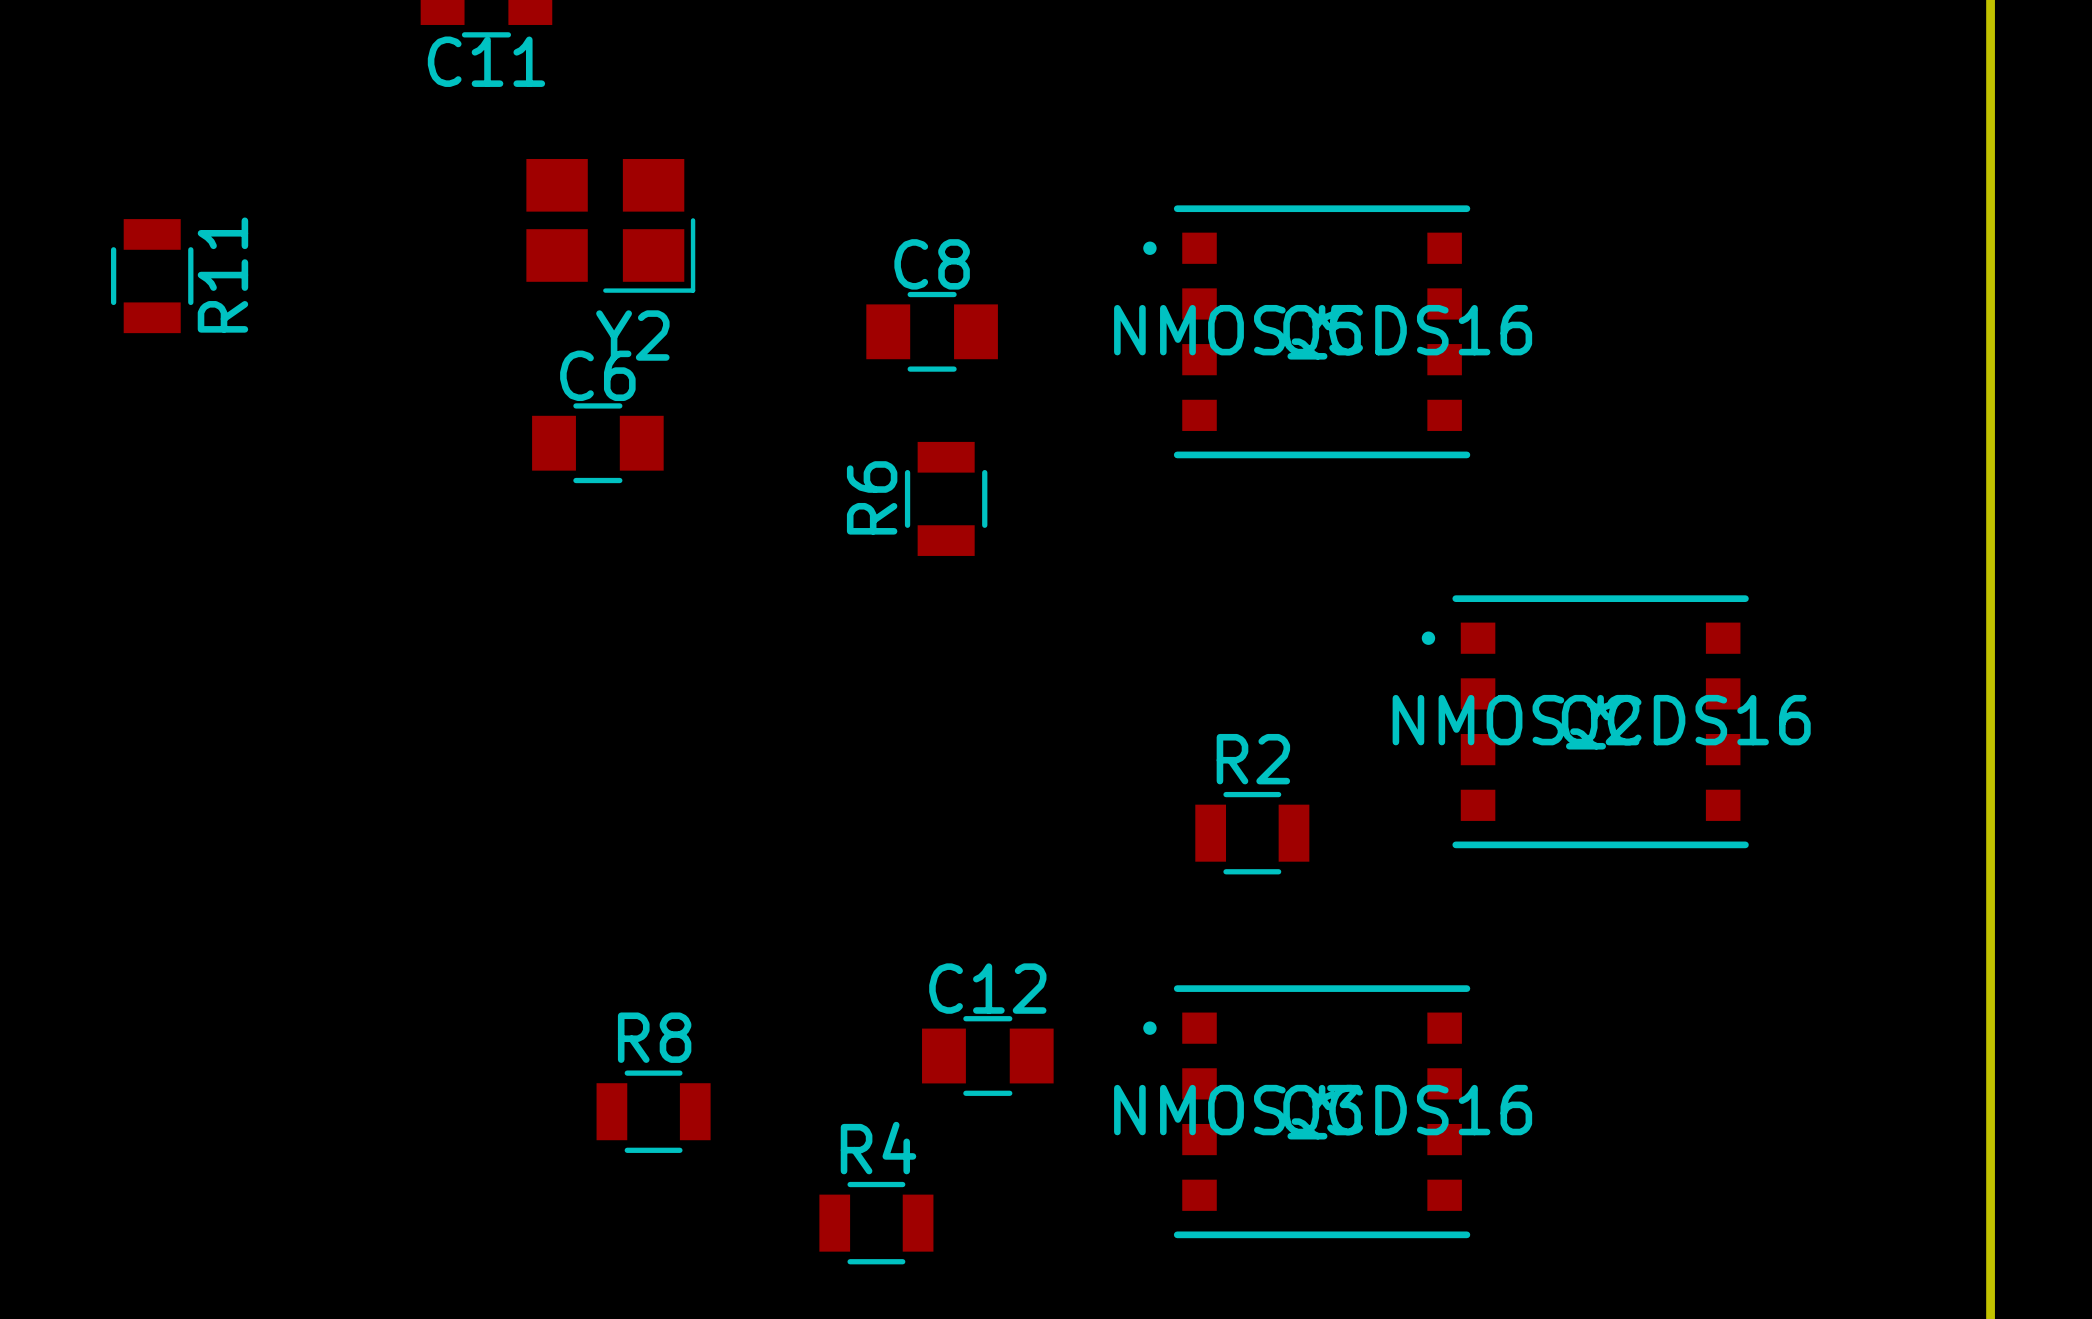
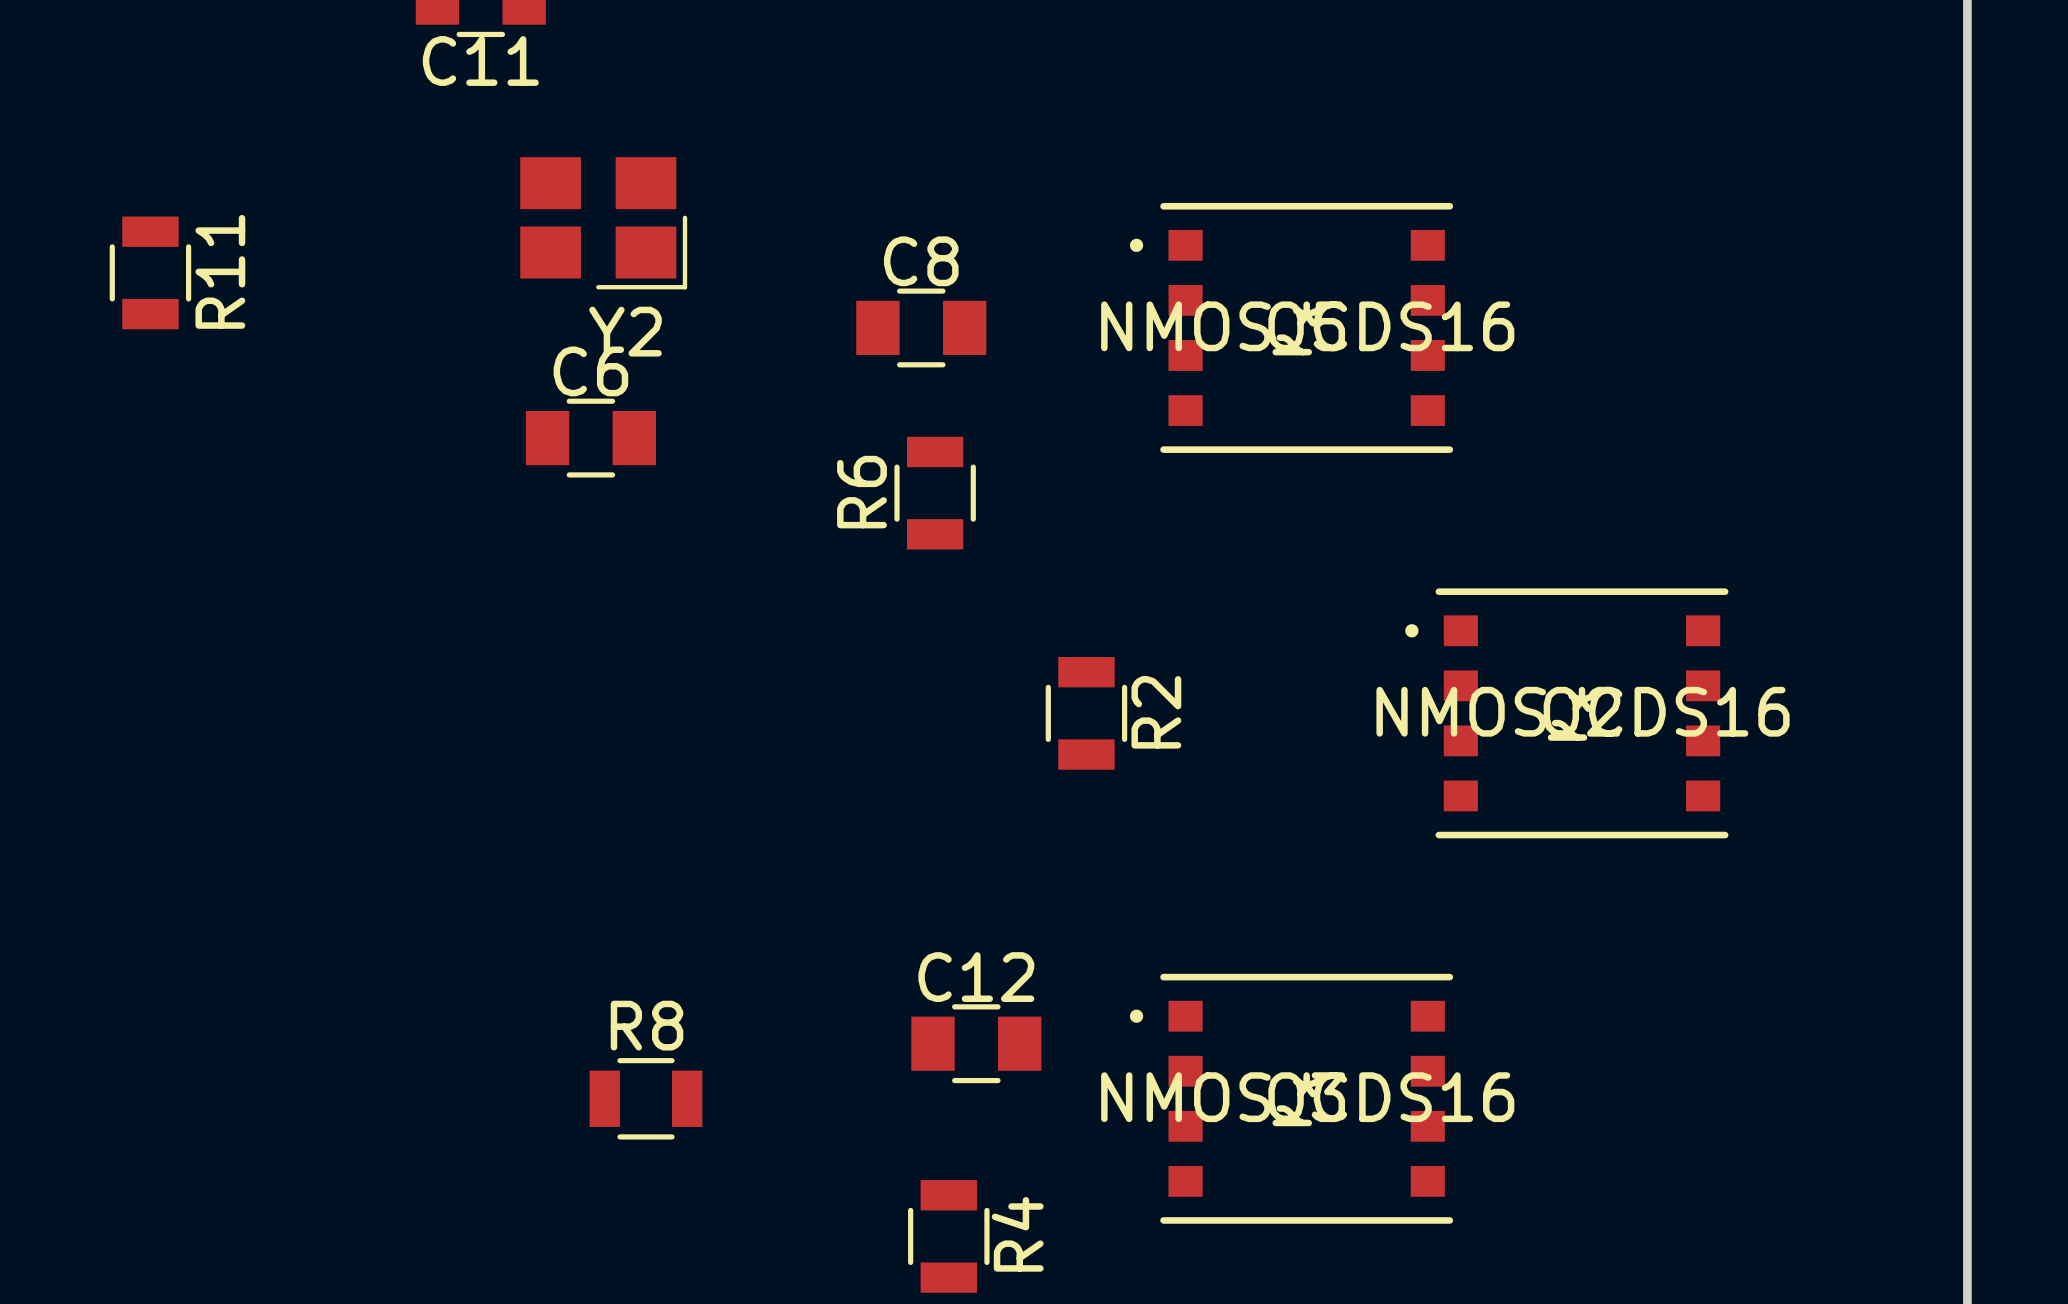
R2 rotation: 0° (1252, 833) -> 90° clockwise (1086, 713)
R2 position: (1252, 833) -> (1086, 713)
R4 rotation: 0° (876, 1223) -> 90° clockwise (948, 1236)
R4 position: (876, 1223) -> (948, 1236)

